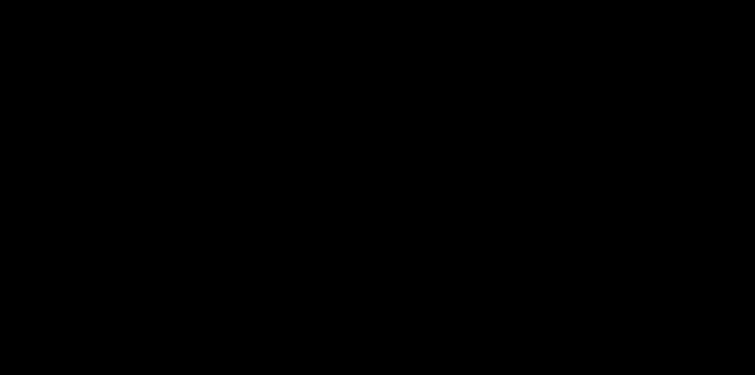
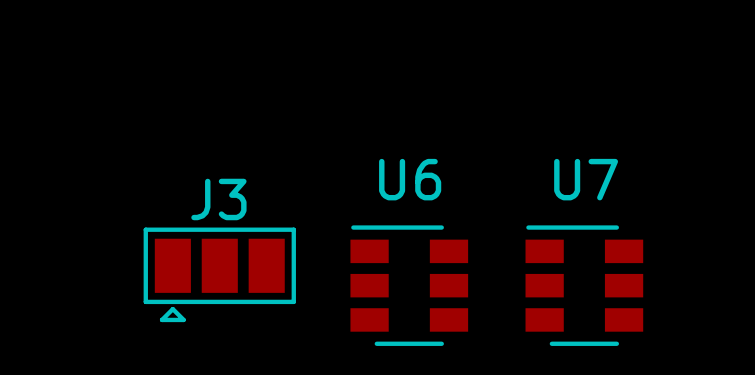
J3: none -> (219, 274)
U6: none -> (409, 285)
U7: none -> (584, 285)

